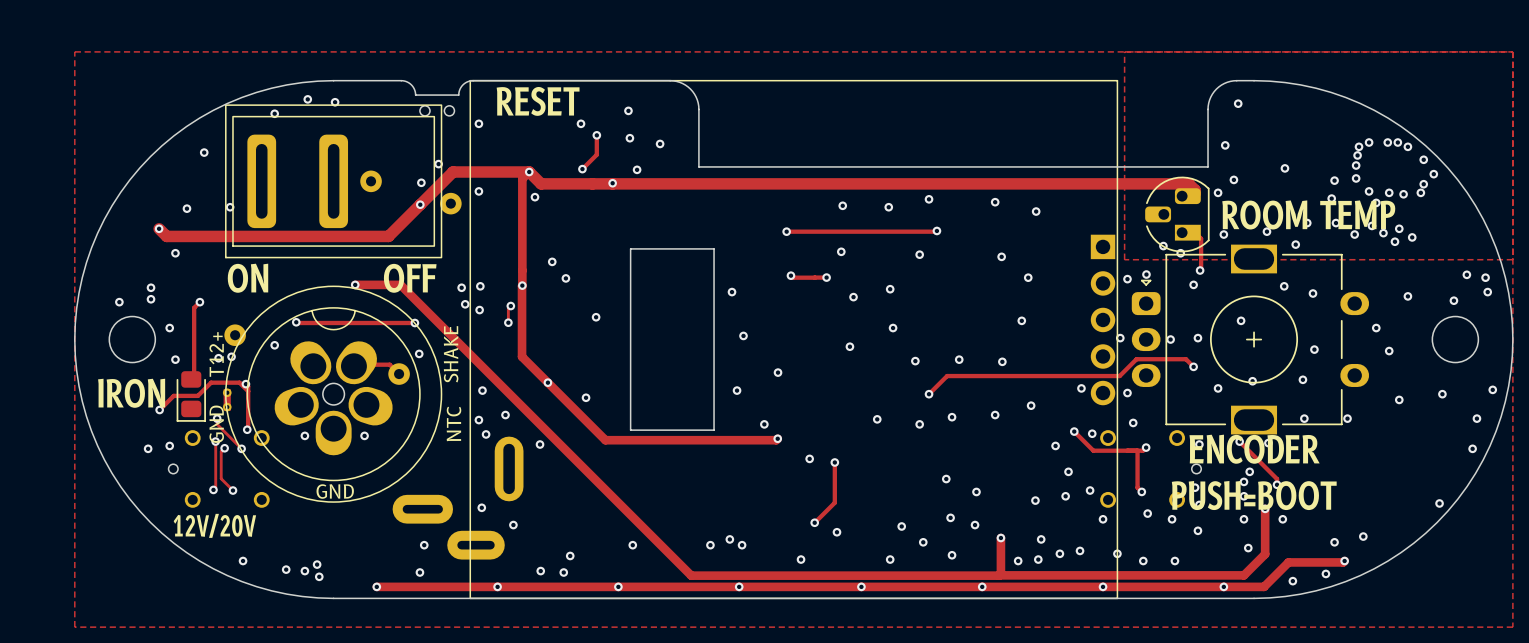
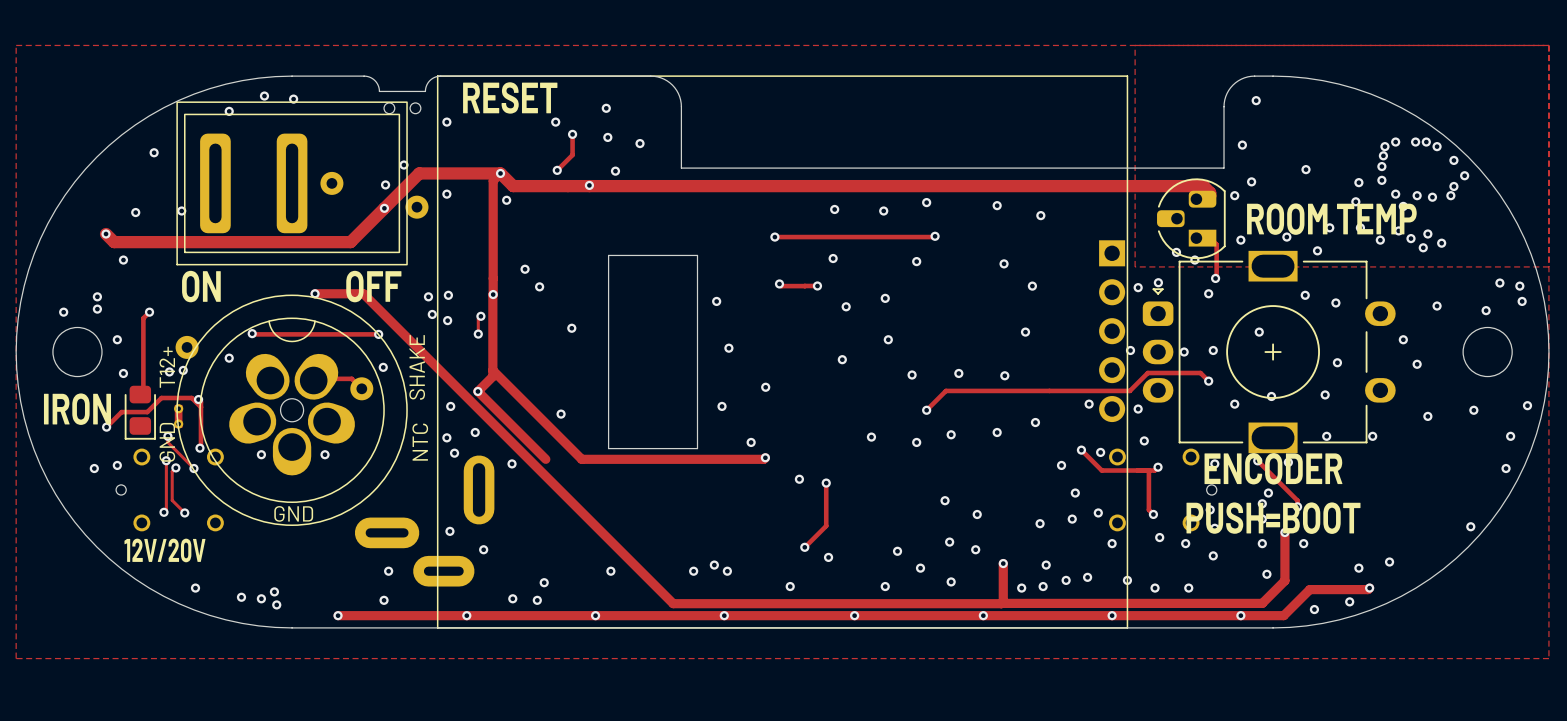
track: none -> (492, 370) (492, 376) (477, 391)
track: none -> (477, 391) (545, 459)
via position: (547, 382) -> (477, 391)

